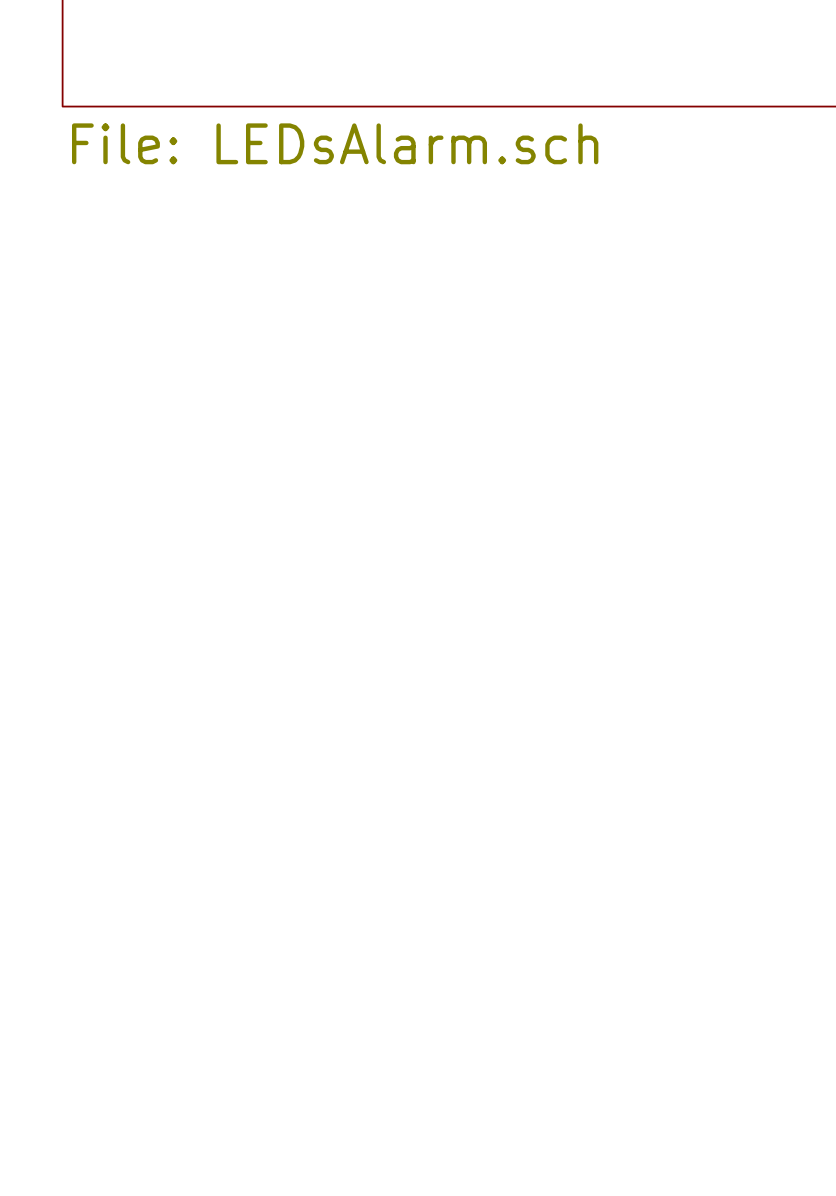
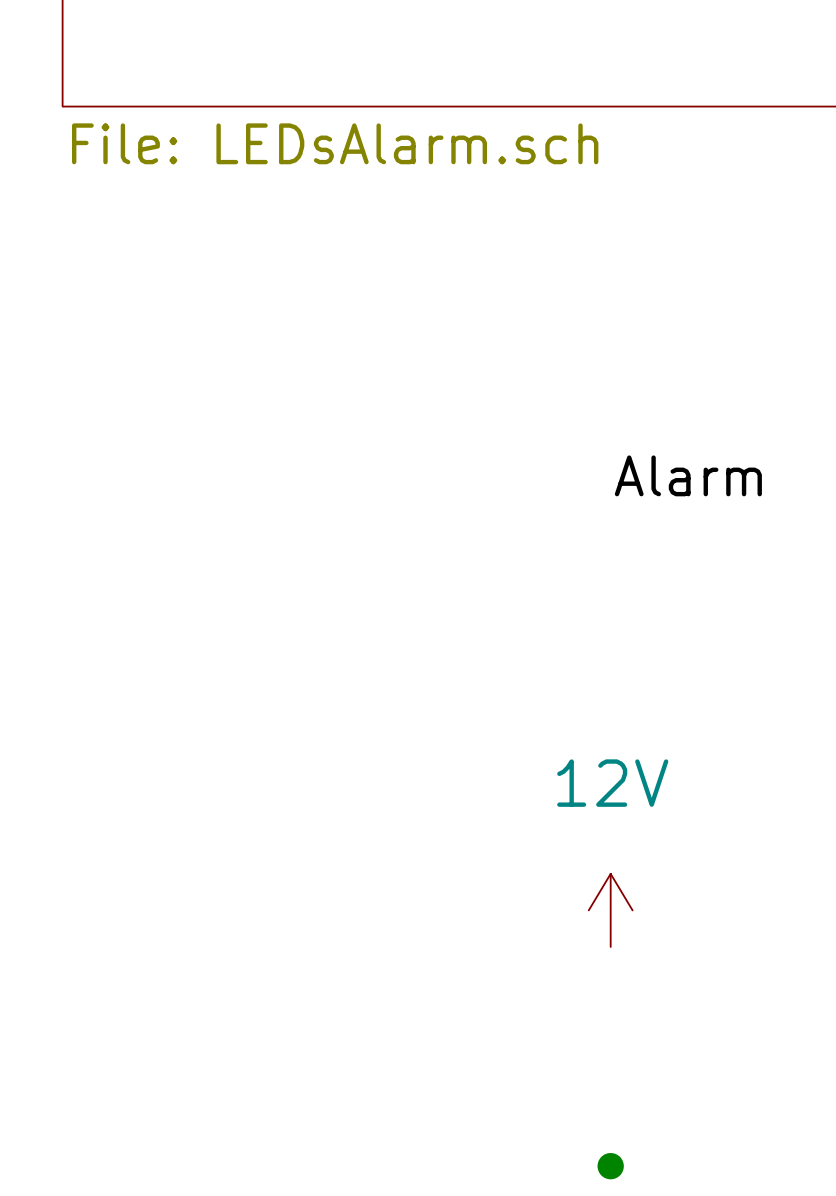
label: none -> Alarm (688, 475)
power symbol: none -> 12V (610, 910)
junction: none -> (610, 1166)

